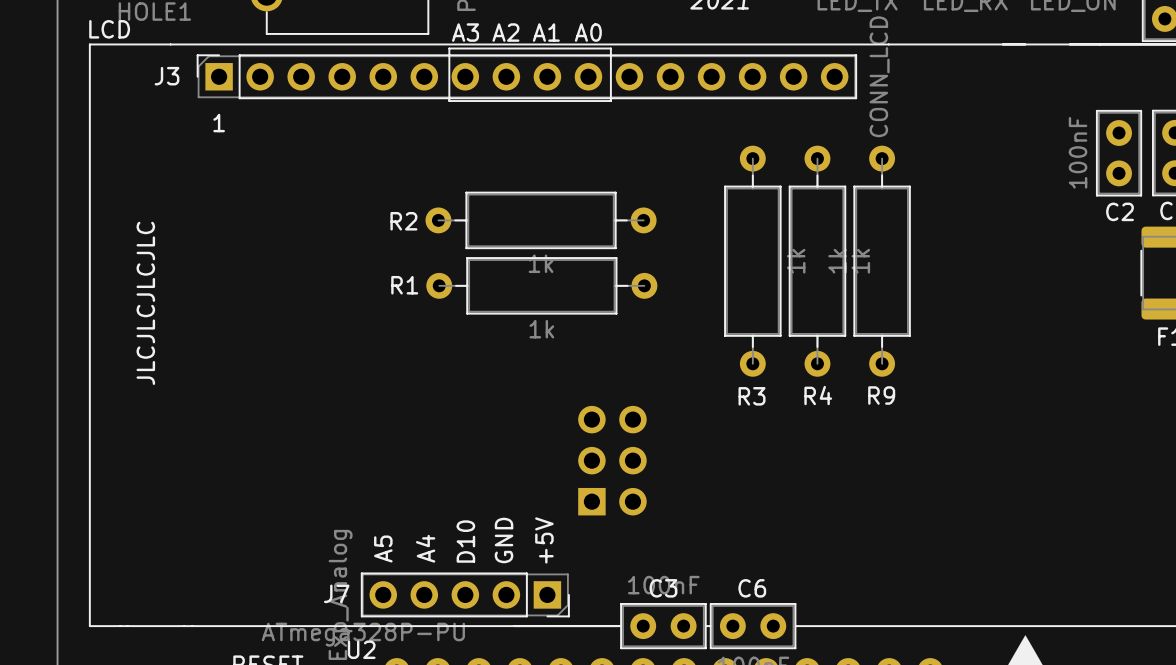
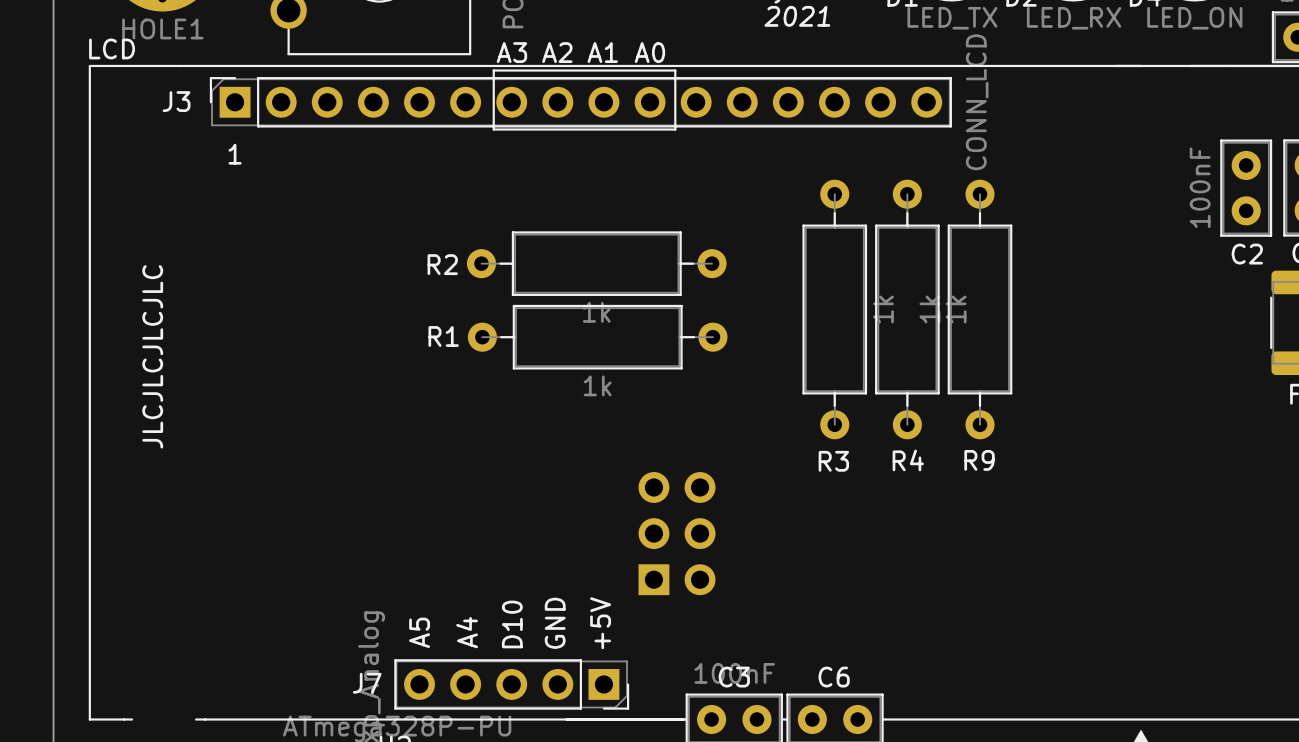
line: (127, 626) (184, 626) -> none

